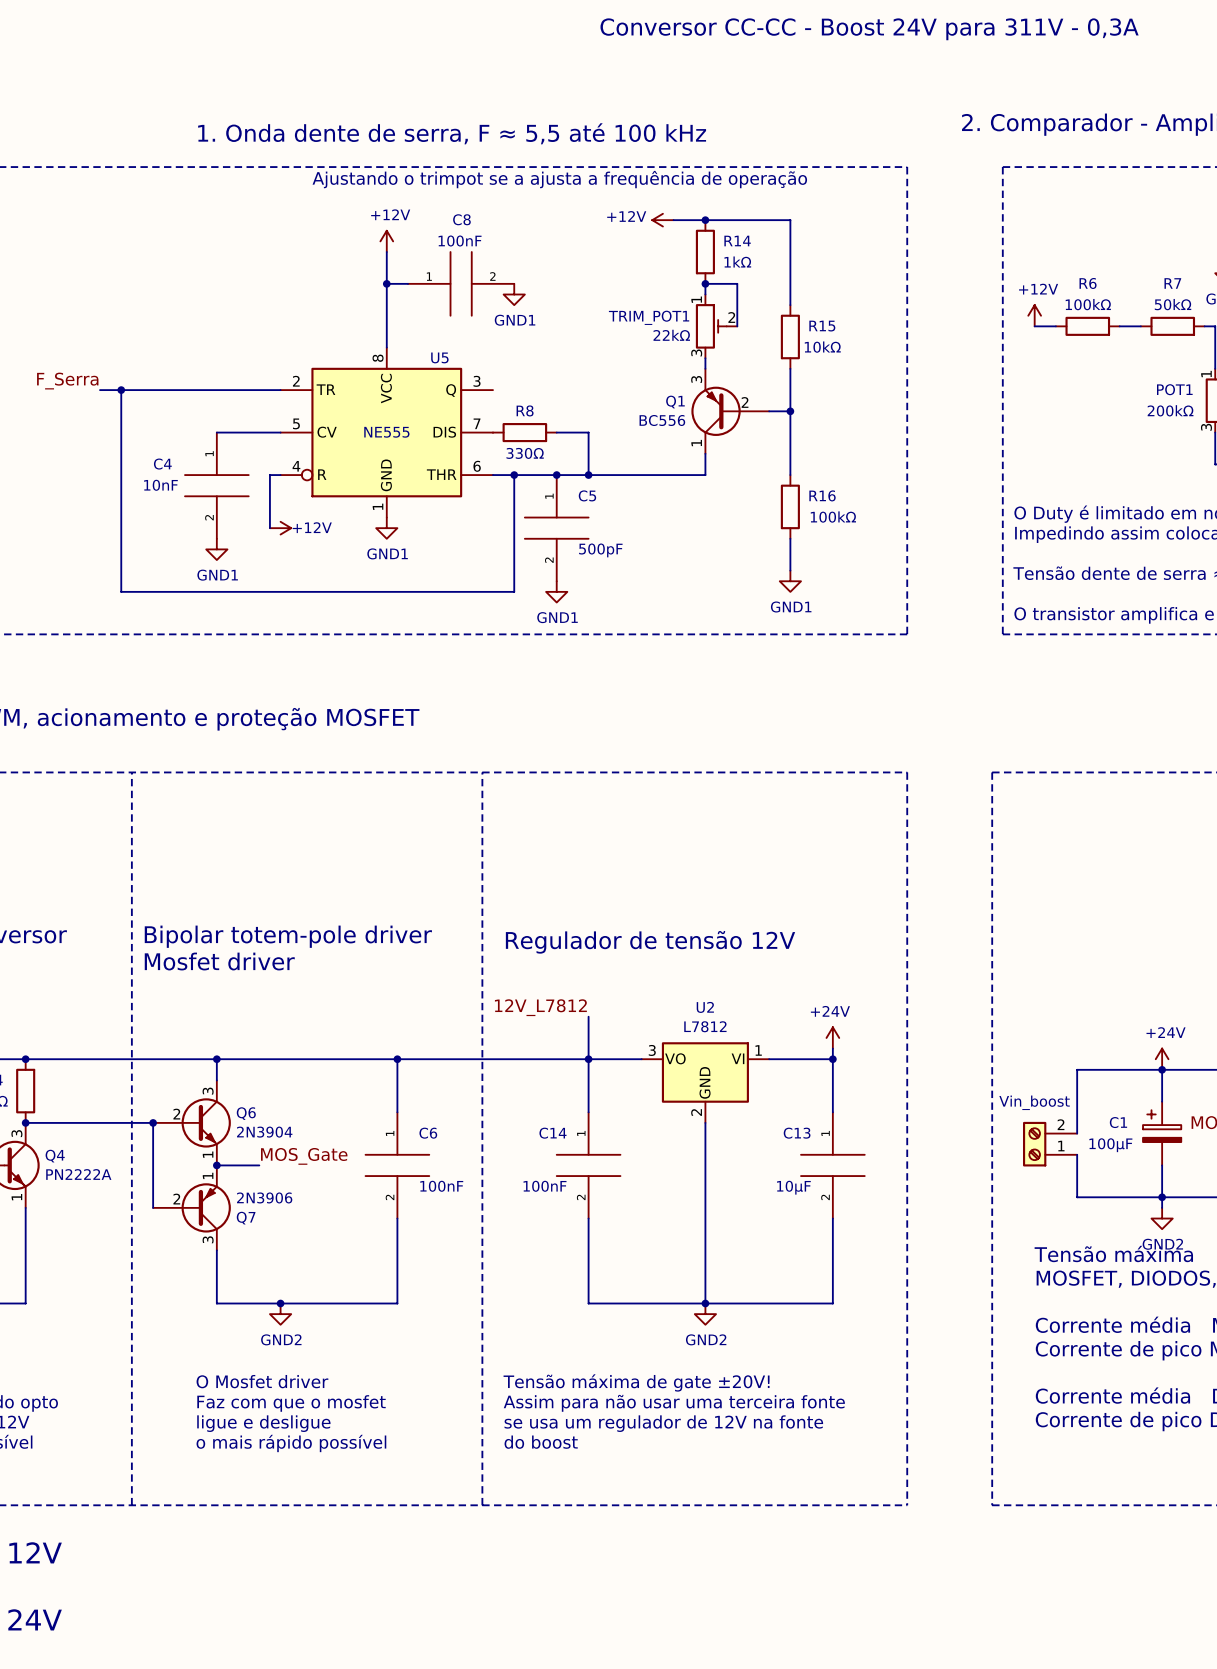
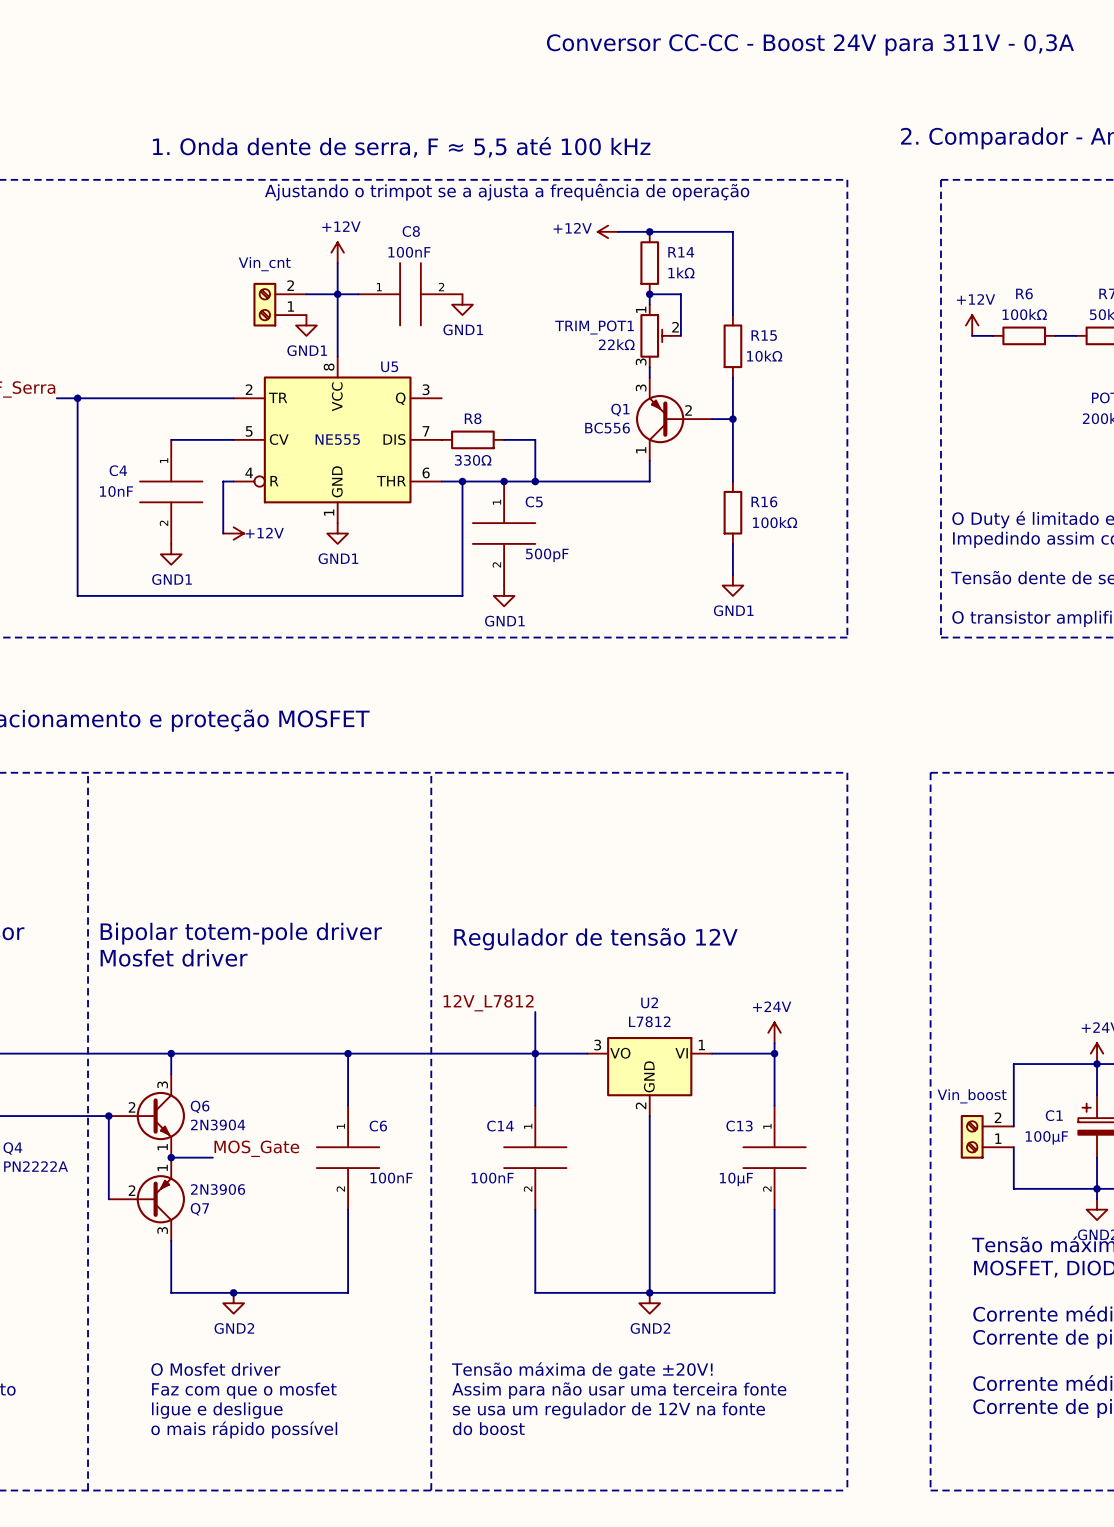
wire: none -> (306, 294) (337, 294)
part: none -> Vin_cnt (279, 304)
power symbol: none -> GND1 (306, 325)

